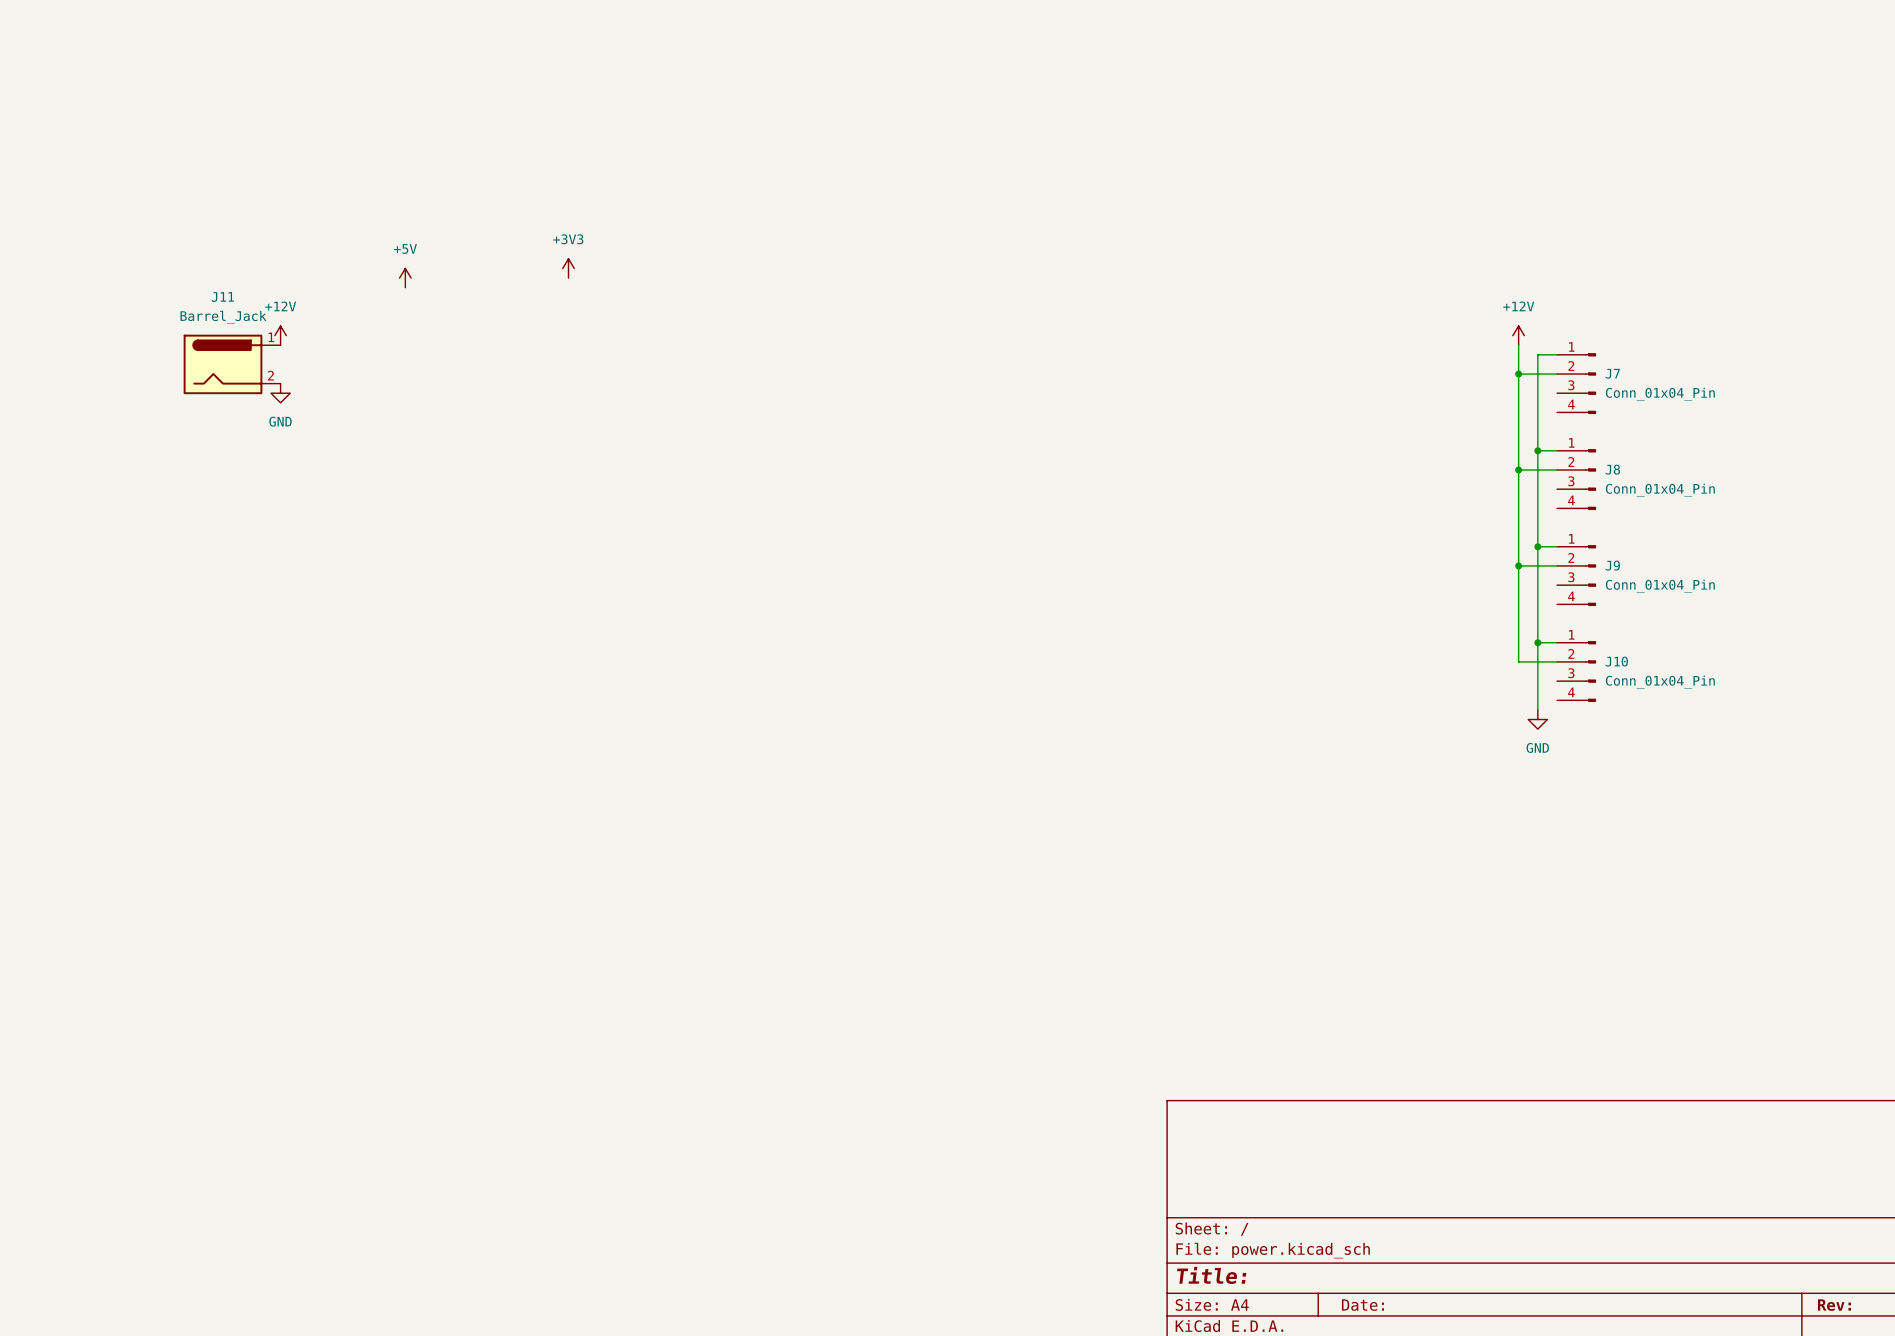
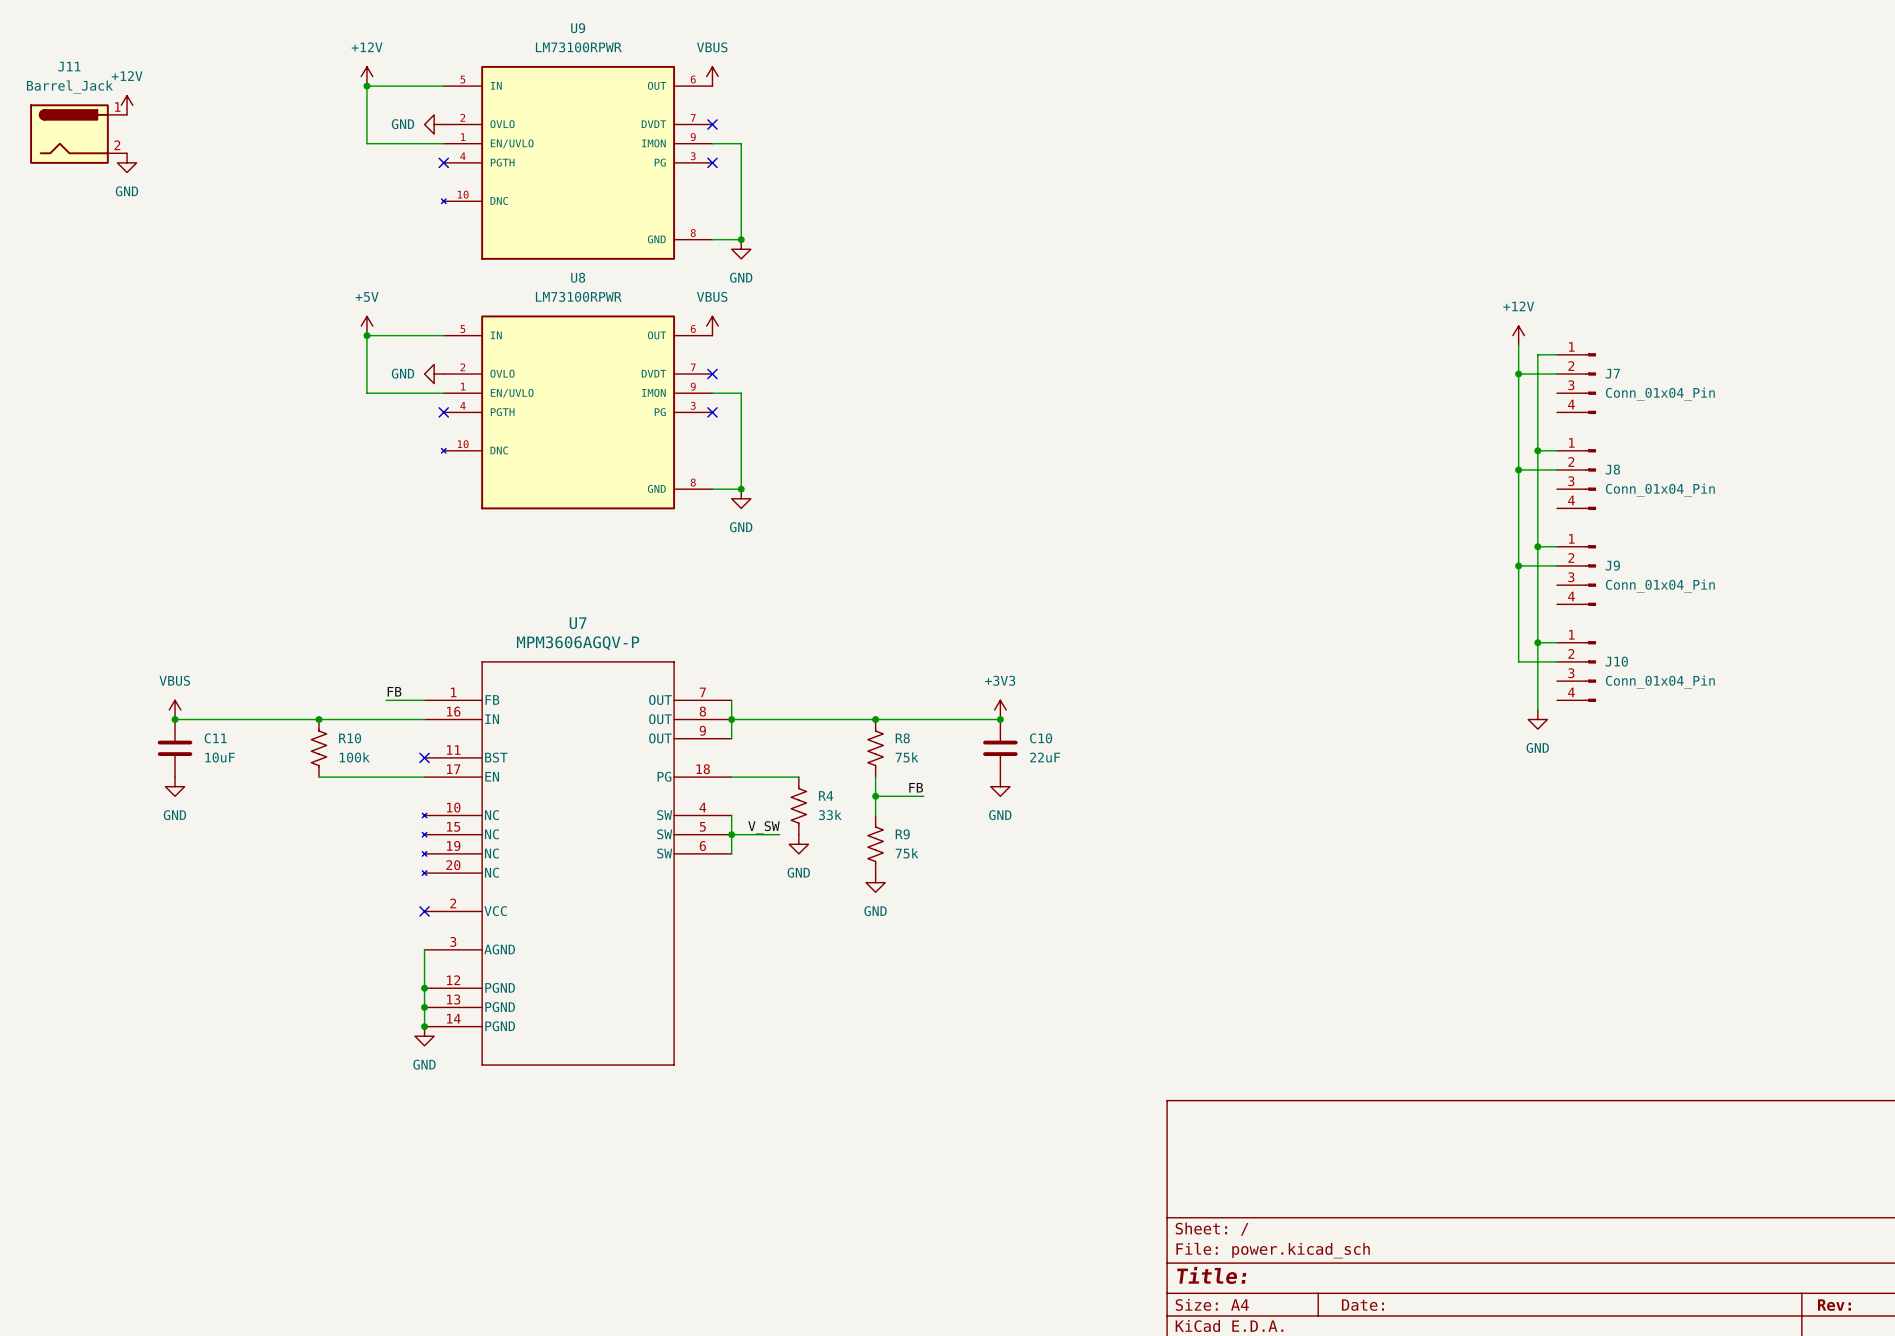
power symbol: none -> +12V (366, 76)
power symbol: none -> VBUS (712, 76)
junction: none -> (366, 86)
wire: none -> (443, 86) (366, 86) (366, 143) (443, 143)
power symbol: none -> +12V (127, 105)
power symbol: none -> GND (434, 124)
no-connect mark: none -> (712, 124)
wire: none -> (712, 143) (741, 143) (741, 239) (712, 239)
power symbol: none -> GND (127, 162)
no-connect mark: none -> (443, 162)
U9: none -> LM73100RPWR (576, 162)
no-connect mark: none -> (712, 162)
junction: none -> (741, 239)
power symbol: none -> GND (741, 249)
power symbol: +3V3 (568, 268) -> none
power symbol position: +5V (405, 278) -> +5V (366, 326)
power symbol: none -> VBUS (712, 326)
power symbol: +12V (280, 335) -> none
junction: none -> (366, 335)
wire: none -> (443, 335) (366, 335) (366, 393) (443, 393)
J11 position: (232, 364) -> (78, 134)
power symbol: none -> GND (434, 374)
no-connect mark: none -> (712, 374)
power symbol: GND (280, 393) -> none
wire: none -> (712, 393) (741, 393) (741, 489) (712, 489)
no-connect mark: none -> (443, 412)
U8: none -> LM73100RPWR (576, 412)
no-connect mark: none -> (712, 412)
junction: none -> (741, 489)
power symbol: none -> GND (741, 498)
label: none -> FB (394, 691)
wire: none -> (386, 700) (424, 700)
wire: none -> (731, 700) (731, 738)
power symbol: none -> VBUS (175, 709)
power symbol: none -> +3V3 (1000, 709)
wire: none -> (175, 719) (424, 719)
junction: none -> (175, 719)
junction: none -> (318, 719)
wire: none -> (731, 719) (1000, 719)
junction: none -> (731, 719)
junction: none -> (875, 719)
junction: none -> (1000, 719)
C11: none -> 10uF (175, 748)
R10: none -> 100k (318, 748)
R8: none -> 75k (875, 748)
C10: none -> 22uF (1000, 748)
no-connect mark: none -> (424, 757)
wire: none -> (318, 777) (424, 777)
wire: none -> (731, 777) (798, 777)
wire: none -> (875, 777) (875, 815)
power symbol: none -> GND (175, 786)
power symbol: none -> GND (1000, 786)
label: none -> FB (916, 787)
wire: none -> (875, 796) (923, 796)
junction: none -> (875, 796)
R4: none -> 33k (798, 805)
wire: none -> (731, 815) (731, 853)
label: none -> V_SW (763, 827)
wire: none -> (731, 834) (779, 834)
junction: none -> (731, 834)
power symbol: none -> GND (798, 844)
R9: none -> 75k (875, 844)
U7: none -> MPM3606AGQV-P (576, 863)
power symbol: none -> GND (875, 882)
no-connect mark: none -> (424, 911)
wire: none -> (424, 949) (424, 1026)
junction: none -> (424, 988)
junction: none -> (424, 1007)
junction: none -> (424, 1026)
power symbol: none -> GND (424, 1036)

